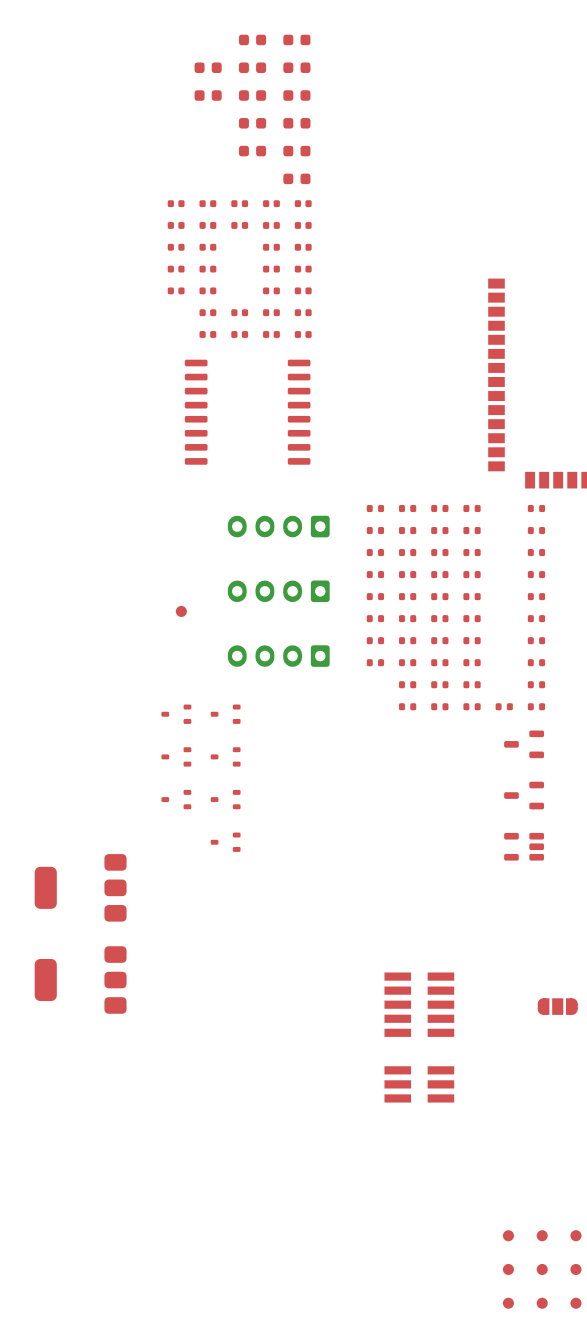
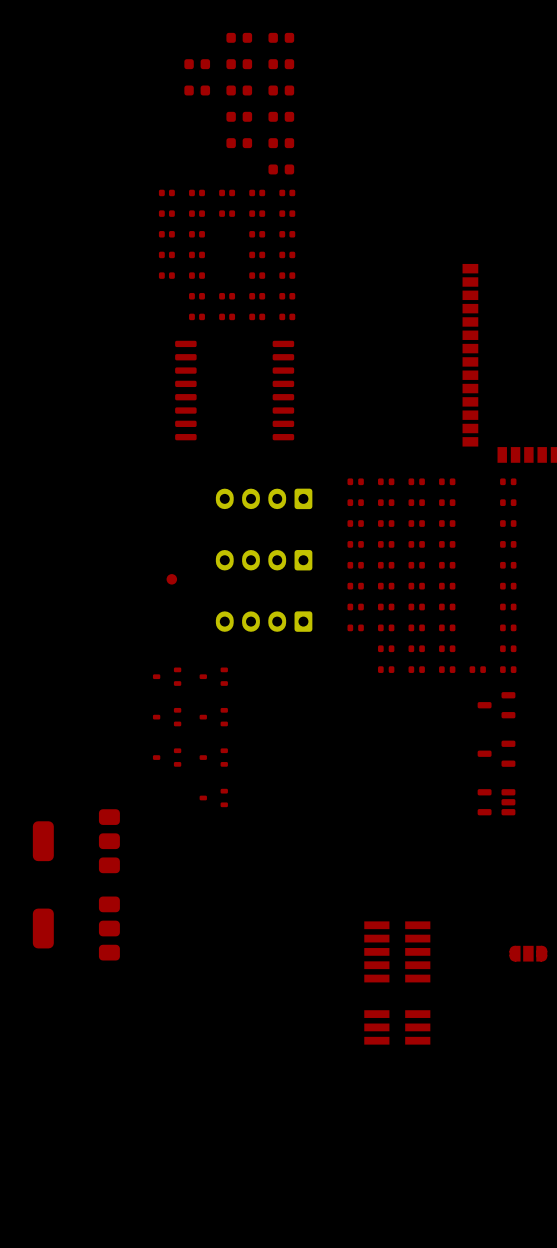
part: (508, 1235) -> none
part: (542, 1235) -> none
part: (575, 1235) -> none
part: (508, 1269) -> none
part: (542, 1269) -> none
part: (575, 1269) -> none
part: (508, 1303) -> none
part: (542, 1303) -> none
part: (575, 1303) -> none

